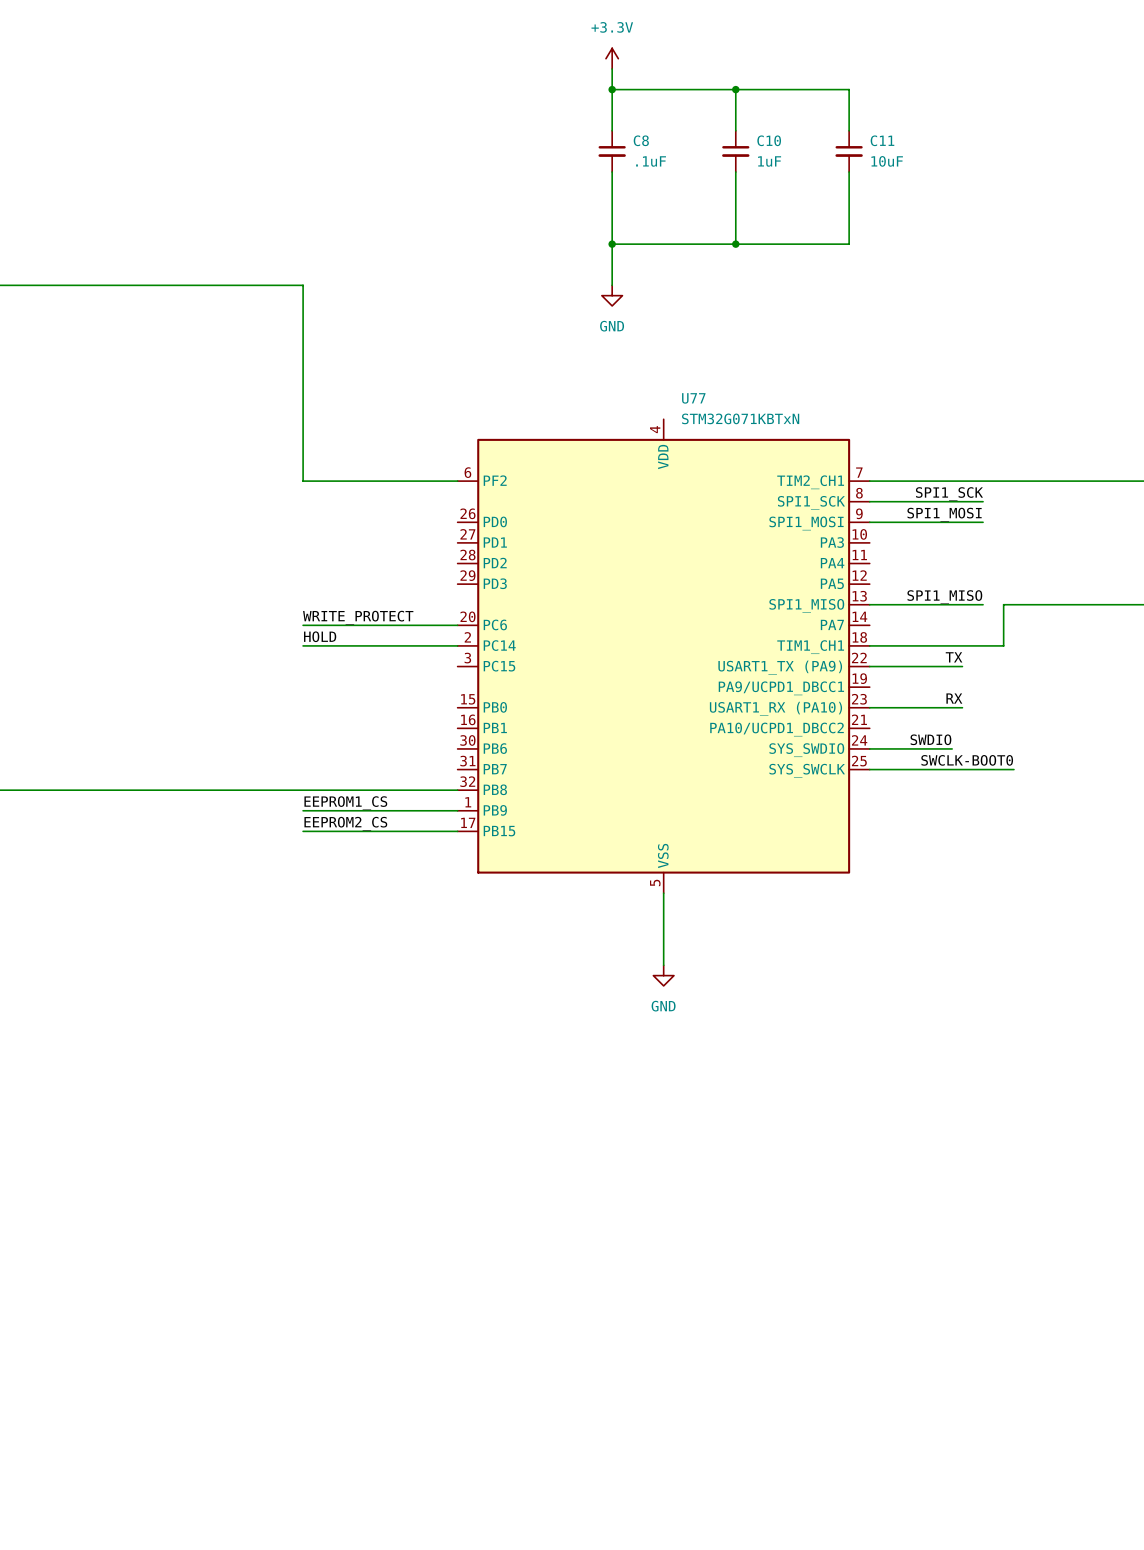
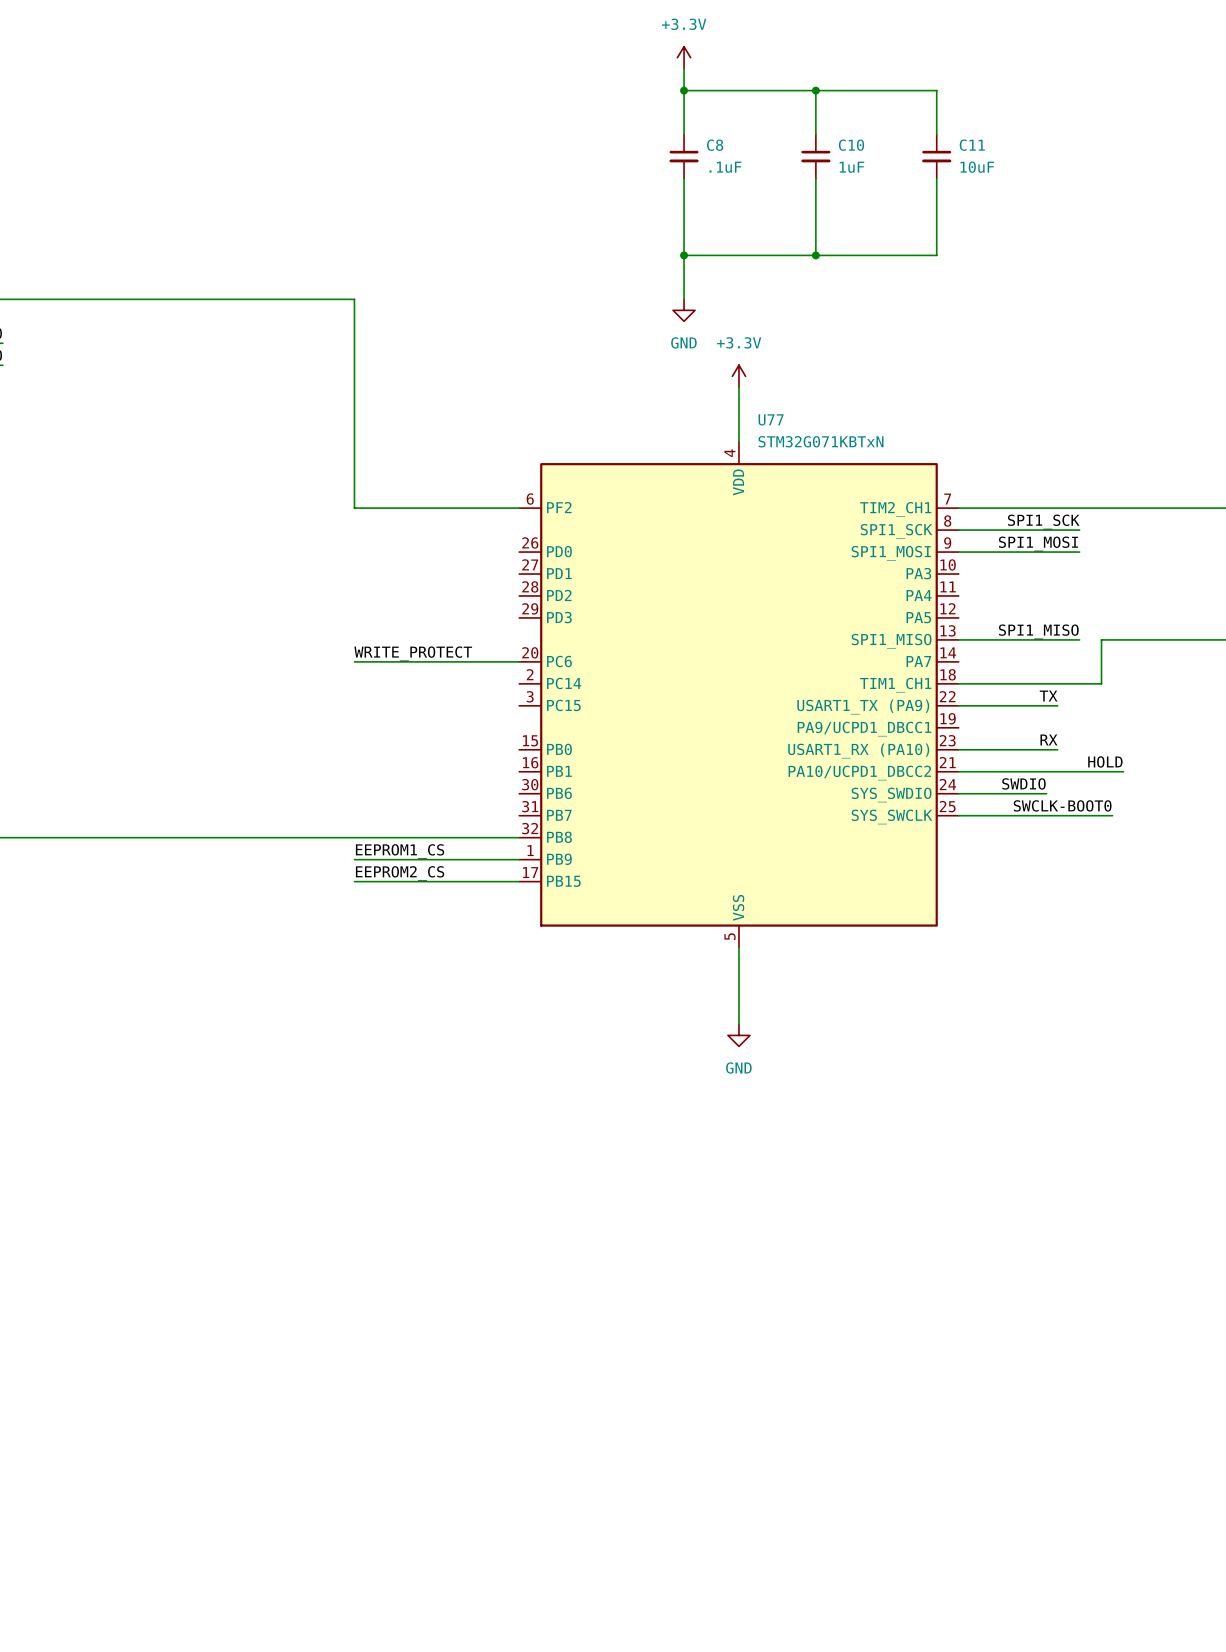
power symbol: none -> +3.3V (738, 376)
wire: none -> (738, 387) (738, 442)
label: HOLD (320, 636) -> none
wire: (303, 645) (457, 645) -> none
label: none -> HOLD (1105, 761)
wire: none -> (958, 771) (1123, 771)

